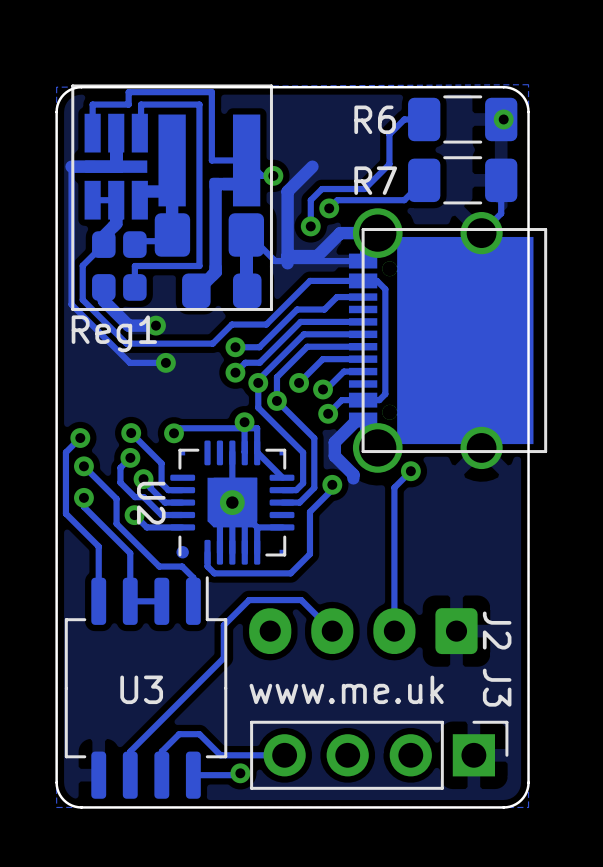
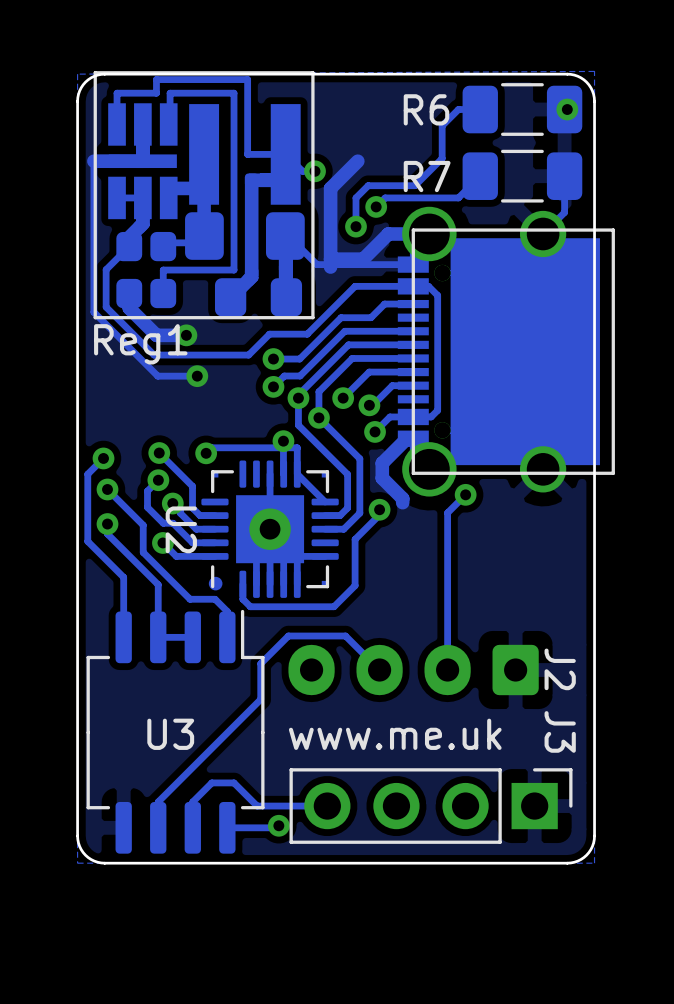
U2 footprint: [170, 440, 295, 565] -> [201, 460, 339, 598]

